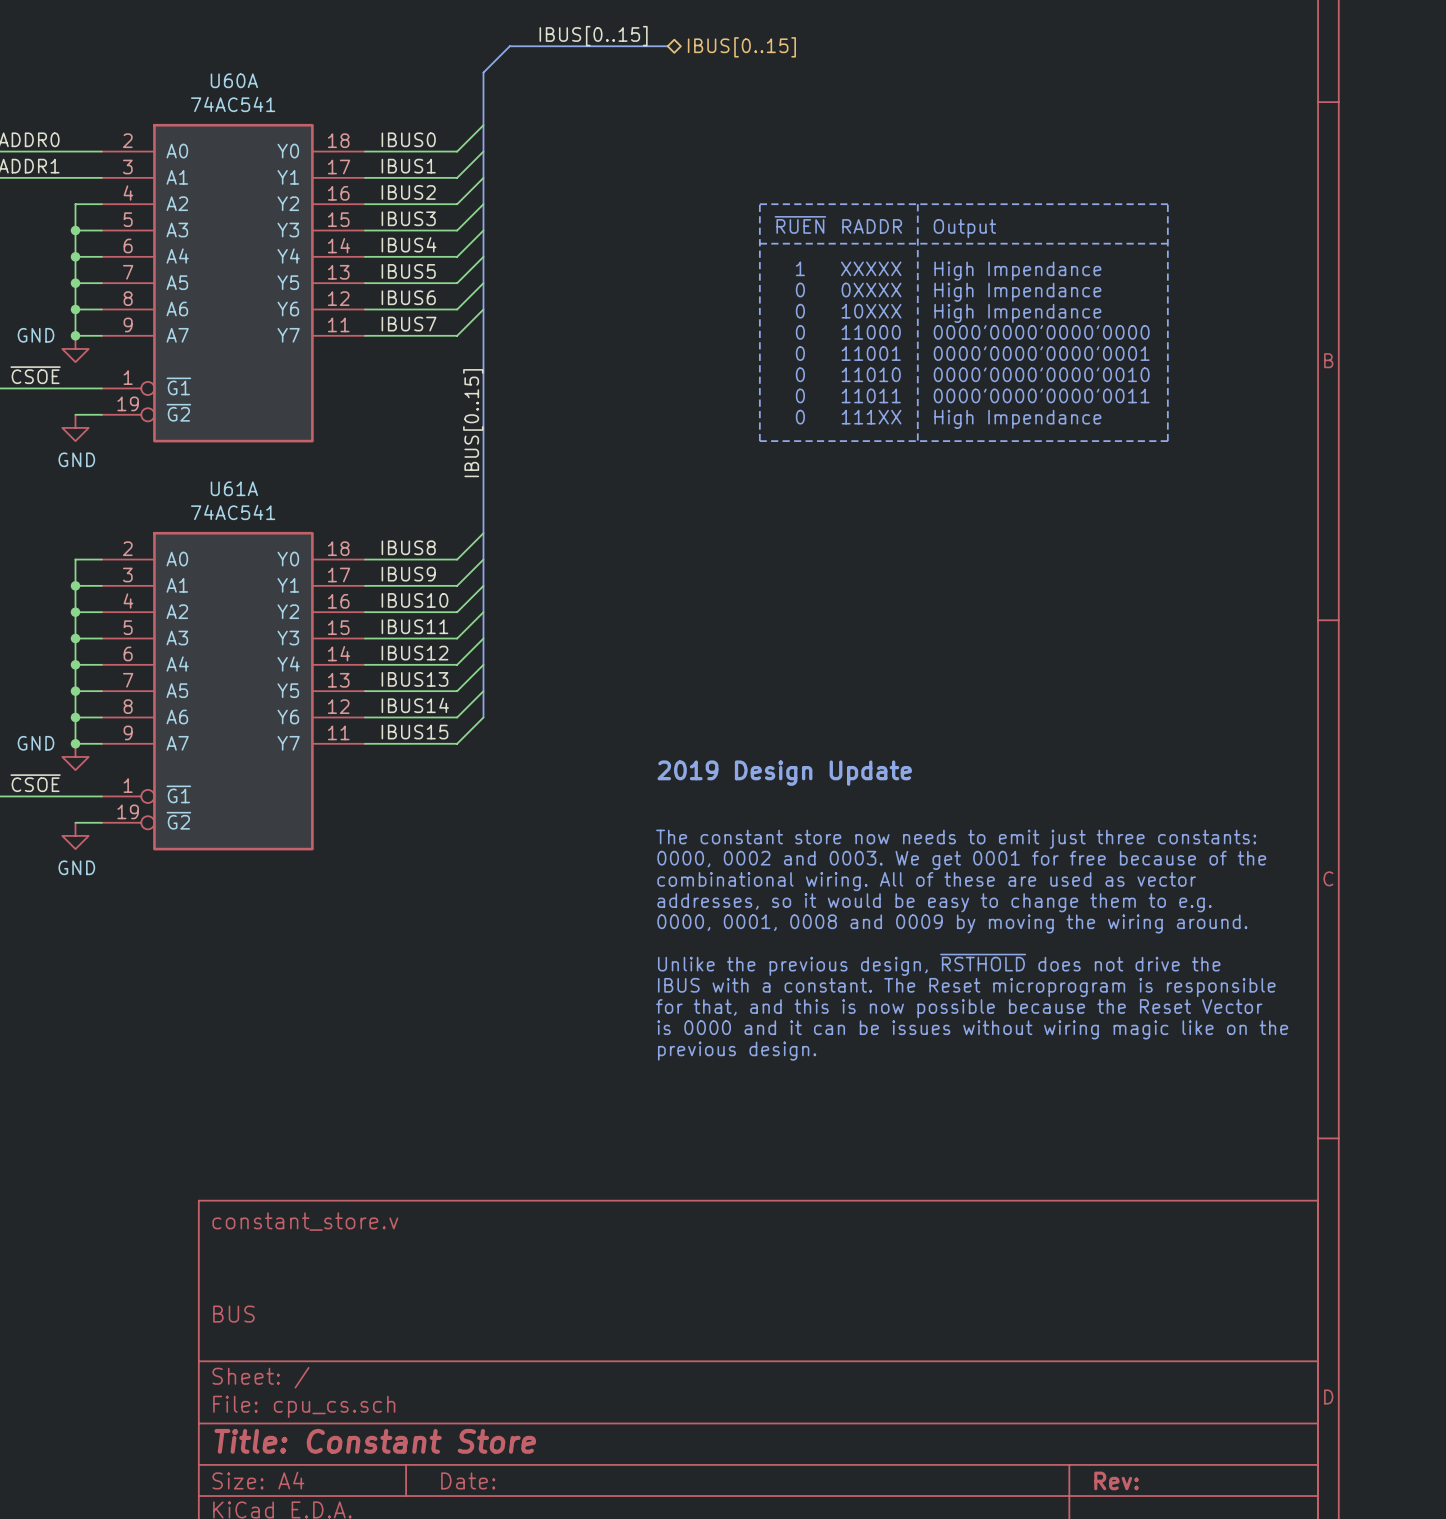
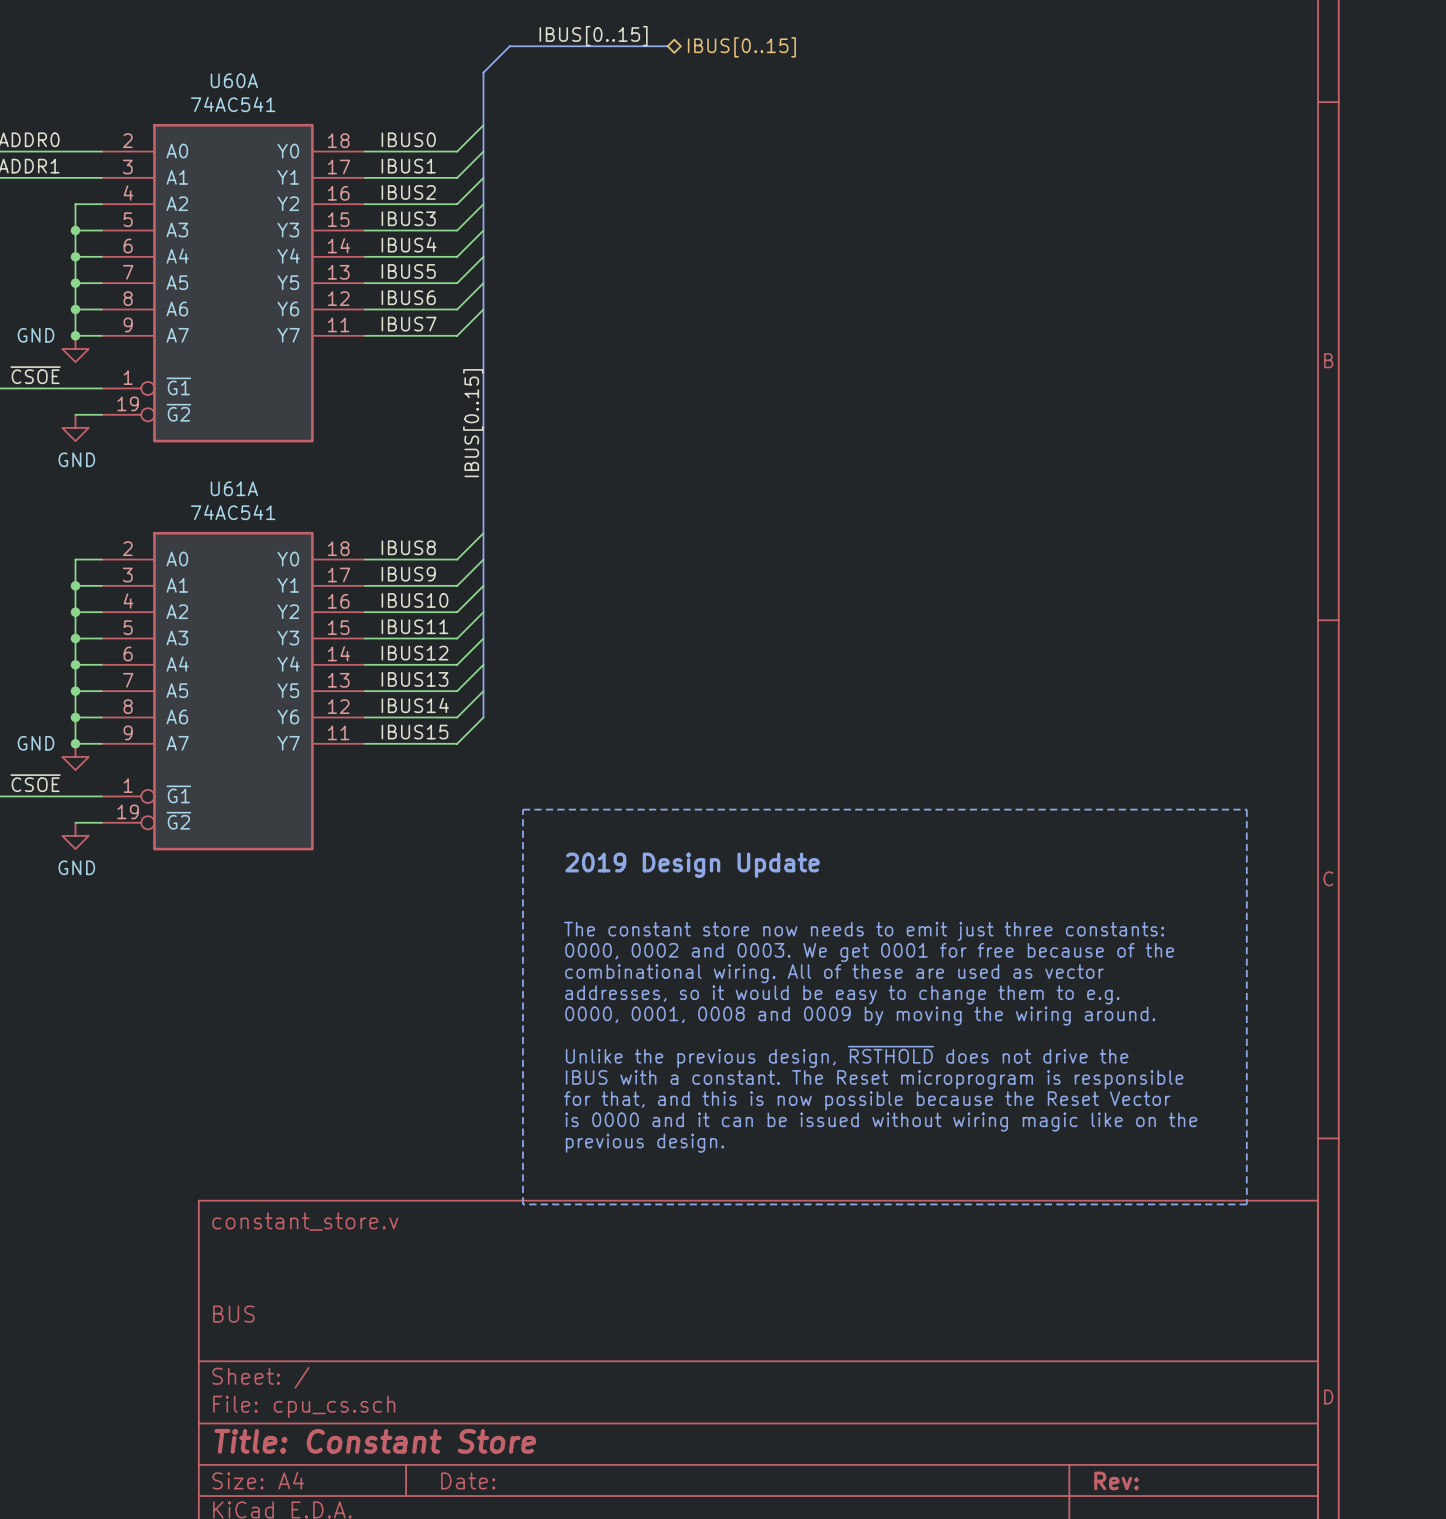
line: (759, 204) (1167, 204) (1167, 441) (759, 441) (759, 204) -> none
line: (917, 204) (917, 441) -> none
text: ~{RUEN} (800, 224) -> none
text: RADDR (872, 226) -> none
text: Output (964, 228) -> none
line: (759, 243) (1167, 243) -> none
text: 1 (800, 268) -> none
text: XXXXX (871, 268) -> none
text: High Impendance (1017, 271) -> none
text: 0 (800, 290) -> none
text: 0XXXX (871, 290) -> none
text: High Impendance (1017, 292) -> none
text: 0 (800, 311) -> none
text: 10XXX (871, 311) -> none
text: High Impendance (1017, 313) -> none
text: 0 (800, 332) -> none
text: 11000 (871, 332) -> none
text: 0000'0000'0000'0000 (1041, 332) -> none
text: 0 (800, 353) -> none
text: 11001 (871, 353) -> none
text: 0000'0000'0000'0001 (1041, 353) -> none
text: 0 (800, 374) -> none
text: 11010 (871, 374) -> none
text: 0000'0000'0000'0010 (1041, 374) -> none
text: 0 (800, 395) -> none
text: 11011 (871, 395) -> none
text: 0000'0000'0000'0011 (1041, 395) -> none
text: 0 (800, 417) -> none
text: 111XX (871, 417) -> none
text: High Impendance (1017, 419) -> none
text position: 2019 Design Update (784, 773) -> 2019 Design Update (692, 865)
line: none -> (522, 809) (522, 1204) (1246, 1204) (1246, 809) (522, 809)
text position: The constant store now needs to emit just three constants: (956, 839) -> The constant store now needs to emit just three constants: (864, 931)
text position: 0000, 0002 and 0003. We get 0001 for free because of the (961, 860) -> 0000, 0002 and 0003. We get 0001 for free because of the (869, 952)
text position: combinational wiring. All of these are used as vector (926, 881) -> combinational wiring. All of these are used as vector (834, 973)
text position: addresses, so it would be easy to change them to e.g. (934, 902) -> addresses, so it would be easy to change them to e.g. (842, 994)
text position: 0000, 0001, 0008 and 0009 by moving the wiring around. (952, 923) -> 0000, 0001, 0008 and 0009 by moving the wiring around. (860, 1016)
text position: Unlike the previous design, ~{RSTHOLD} does not drive the (939, 964) -> Unlike the previous design, ~{RSTHOLD} does not drive the (847, 1056)
text position: IBUS with a constant. The Reset microprogram is responsible (966, 987) -> IBUS with a constant. The Reset microprogram is responsible (874, 1079)
text position: for that, and this is now possible because the Reset Vector (959, 1008) -> for that, and this is now possible because the Reset Vector (867, 1100)
text: is 0000 and it can be issues without wiring magic like on the (972, 1029) -> none
text position: previous design. (737, 1051) -> previous design. (644, 1143)
text: none -> is 0000 and it can be issued without wiring magic like on the (881, 1122)

